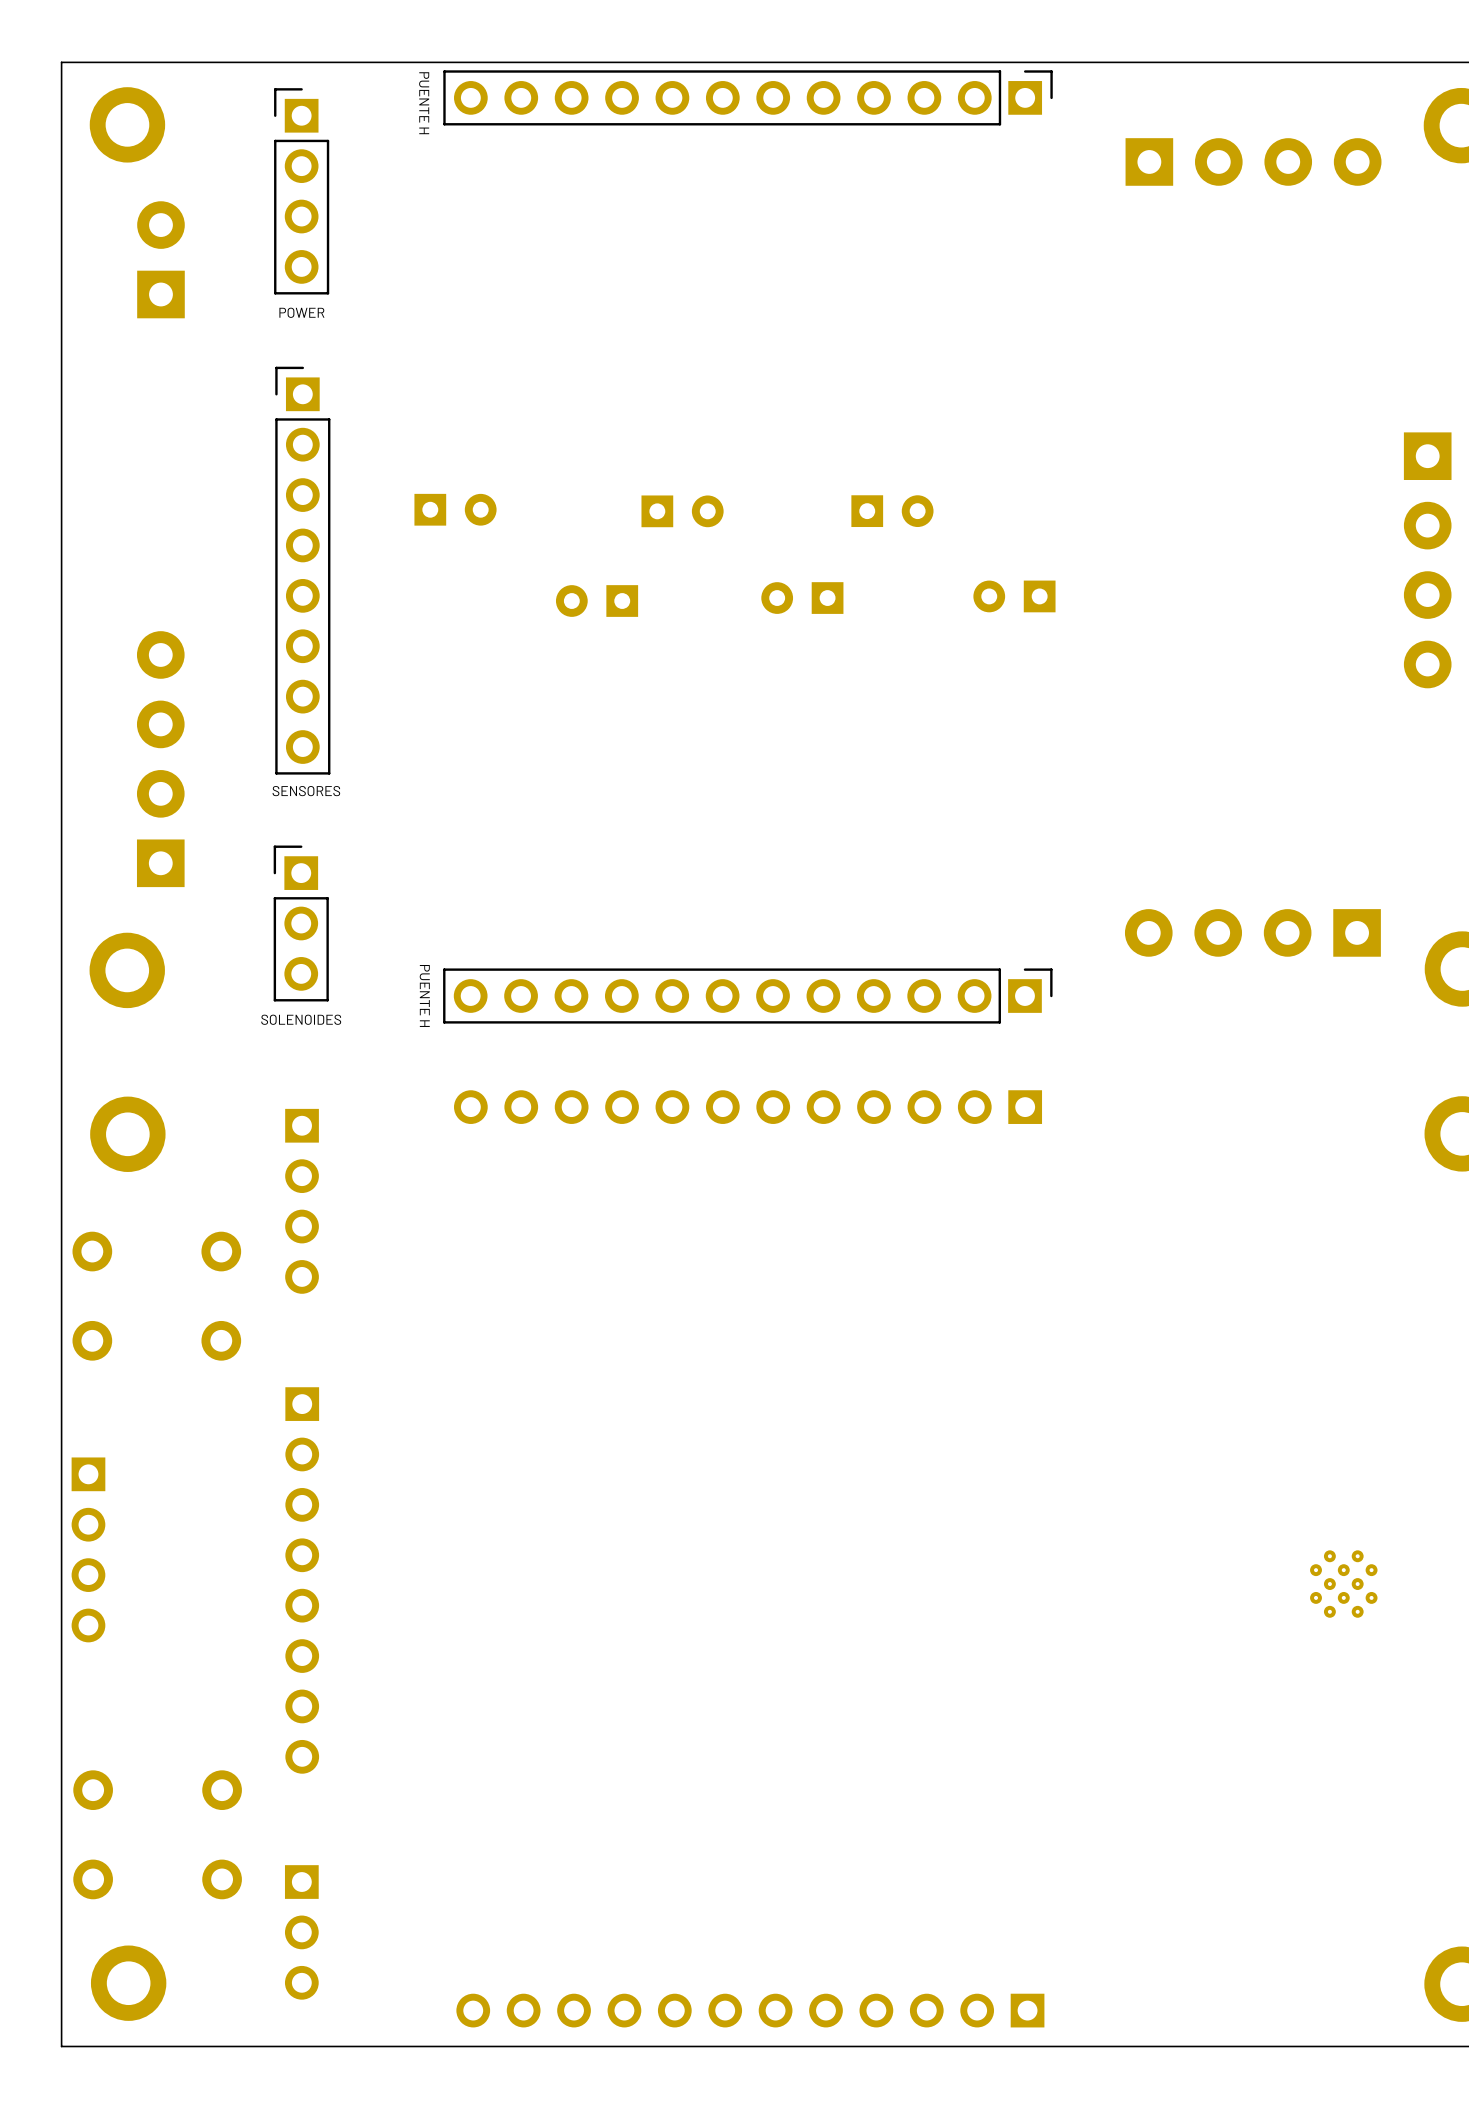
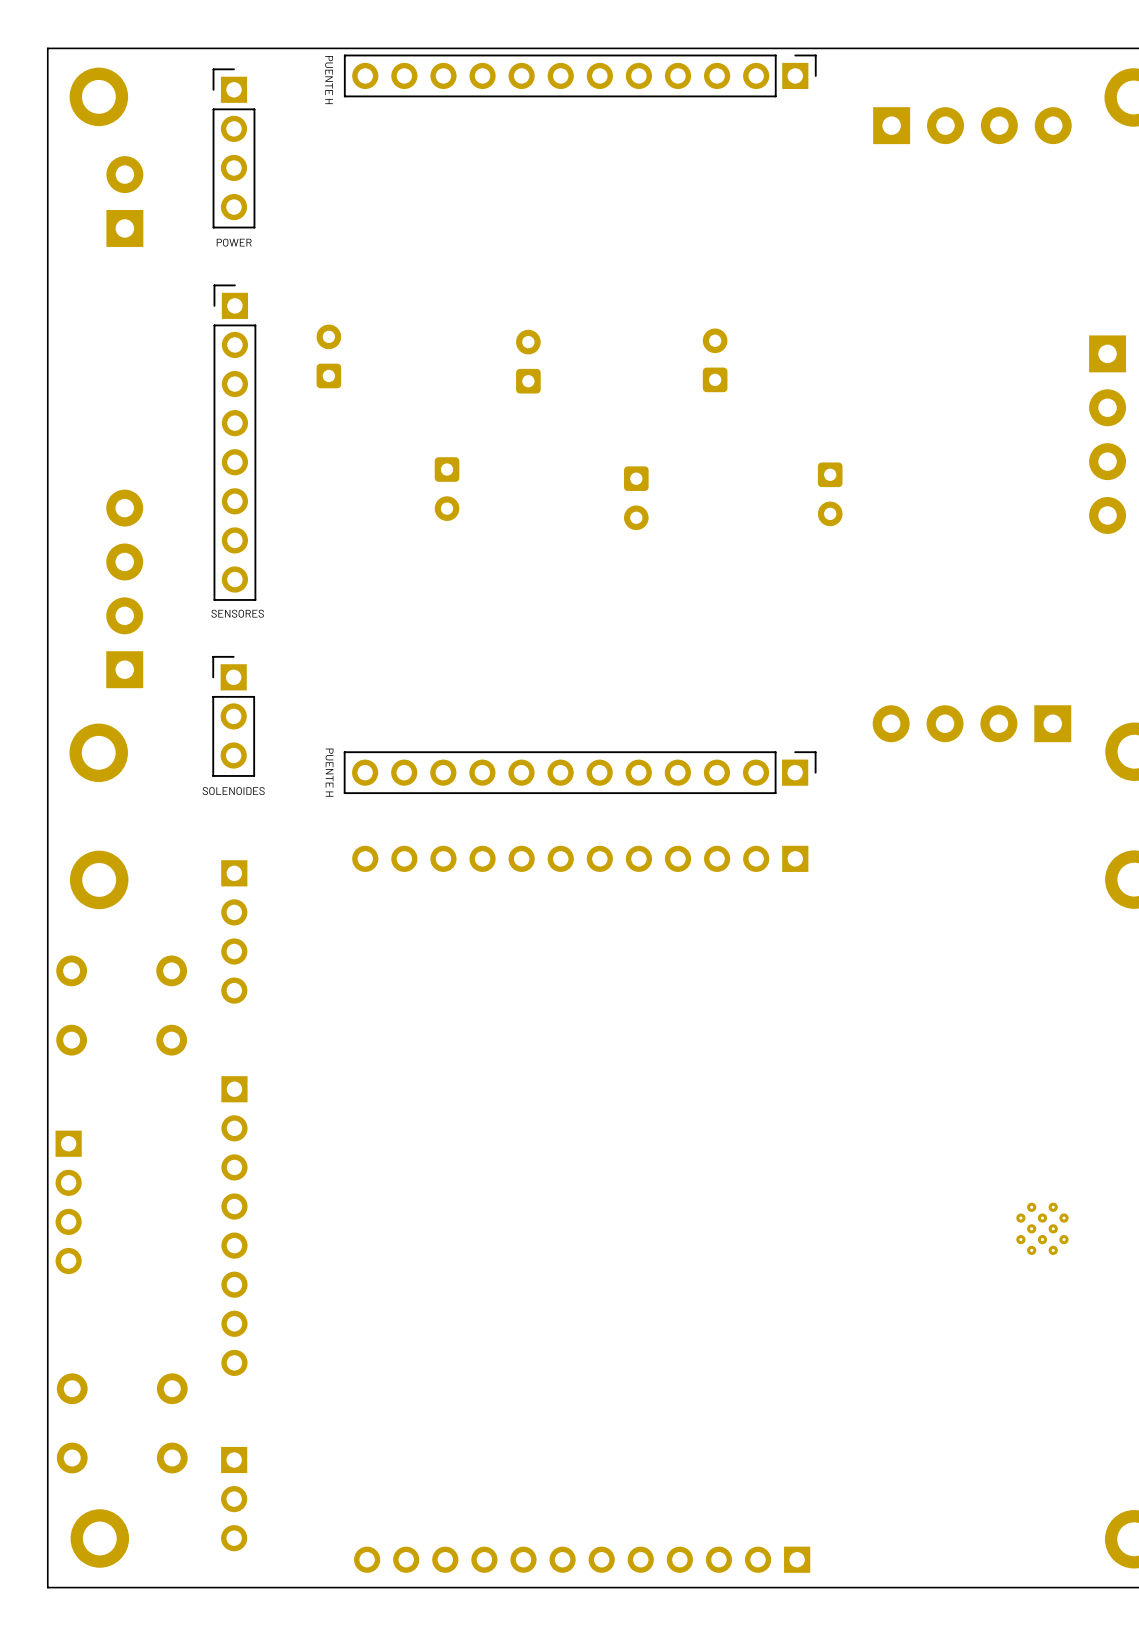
part: none -> (328, 356)
part: none -> (715, 360)
part: none -> (528, 361)
part: (455, 509) -> none
part: (682, 511) -> none
part: (892, 511) -> none
part: (1014, 596) -> none
part: (802, 598) -> none
part: (597, 601) -> none
part: none -> (447, 489)
part: none -> (830, 494)
part: none -> (636, 498)

